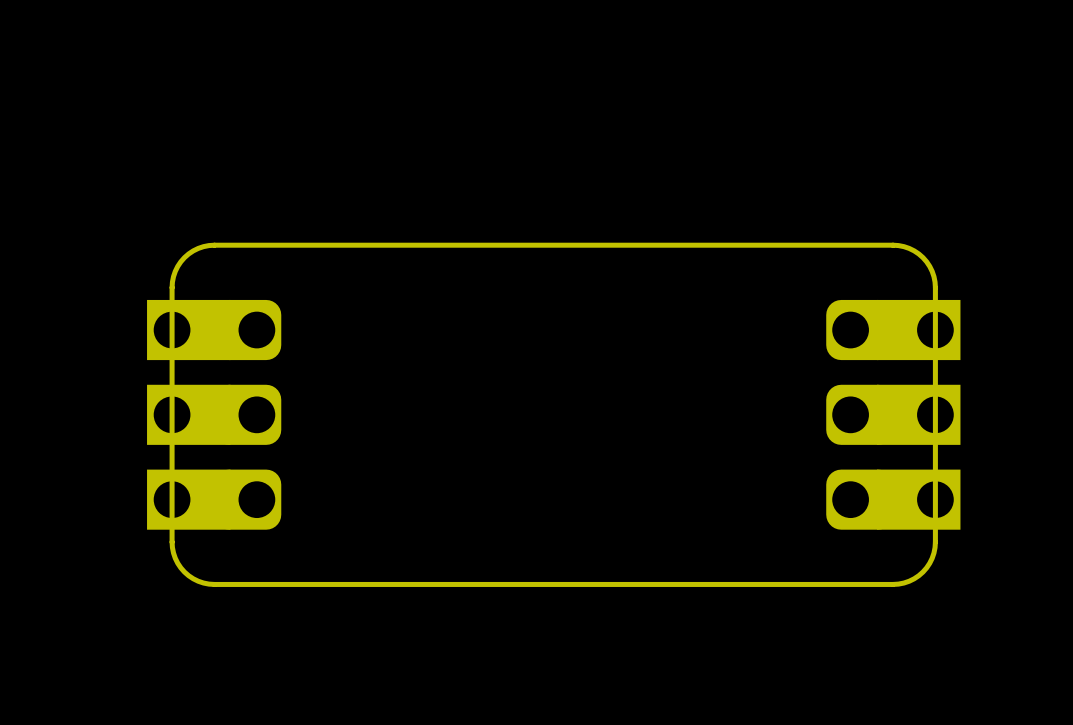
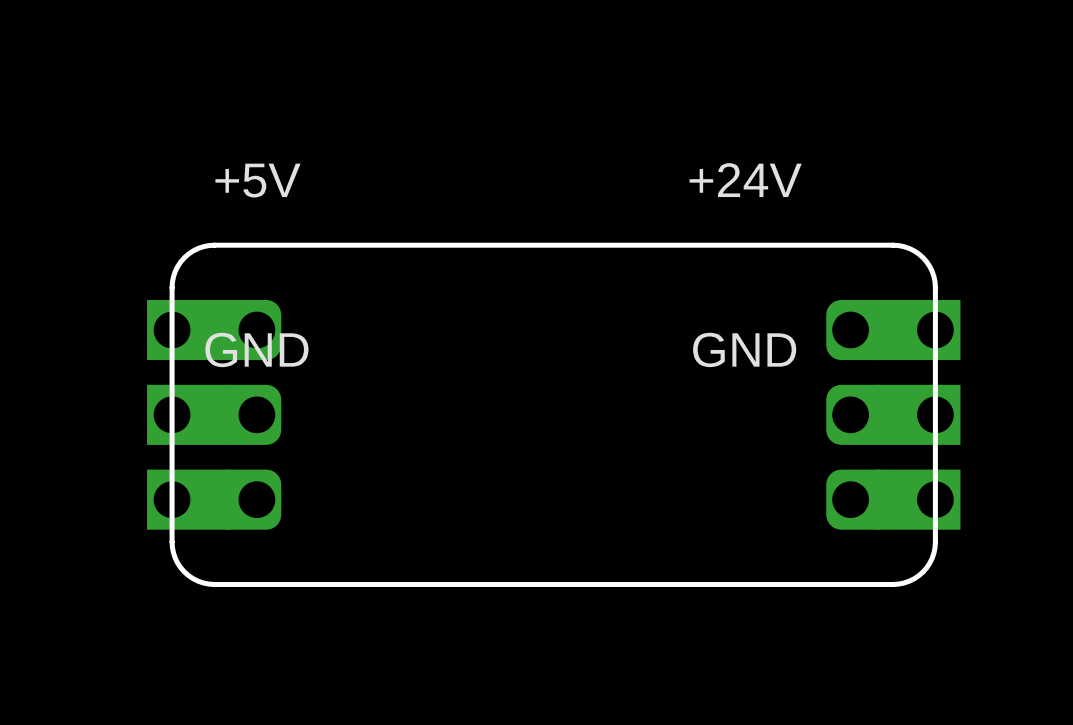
text: none -> +24V (745, 180)
text: none -> +5V (257, 180)
text: none -> GND (256, 349)
text: none -> GND (744, 349)

